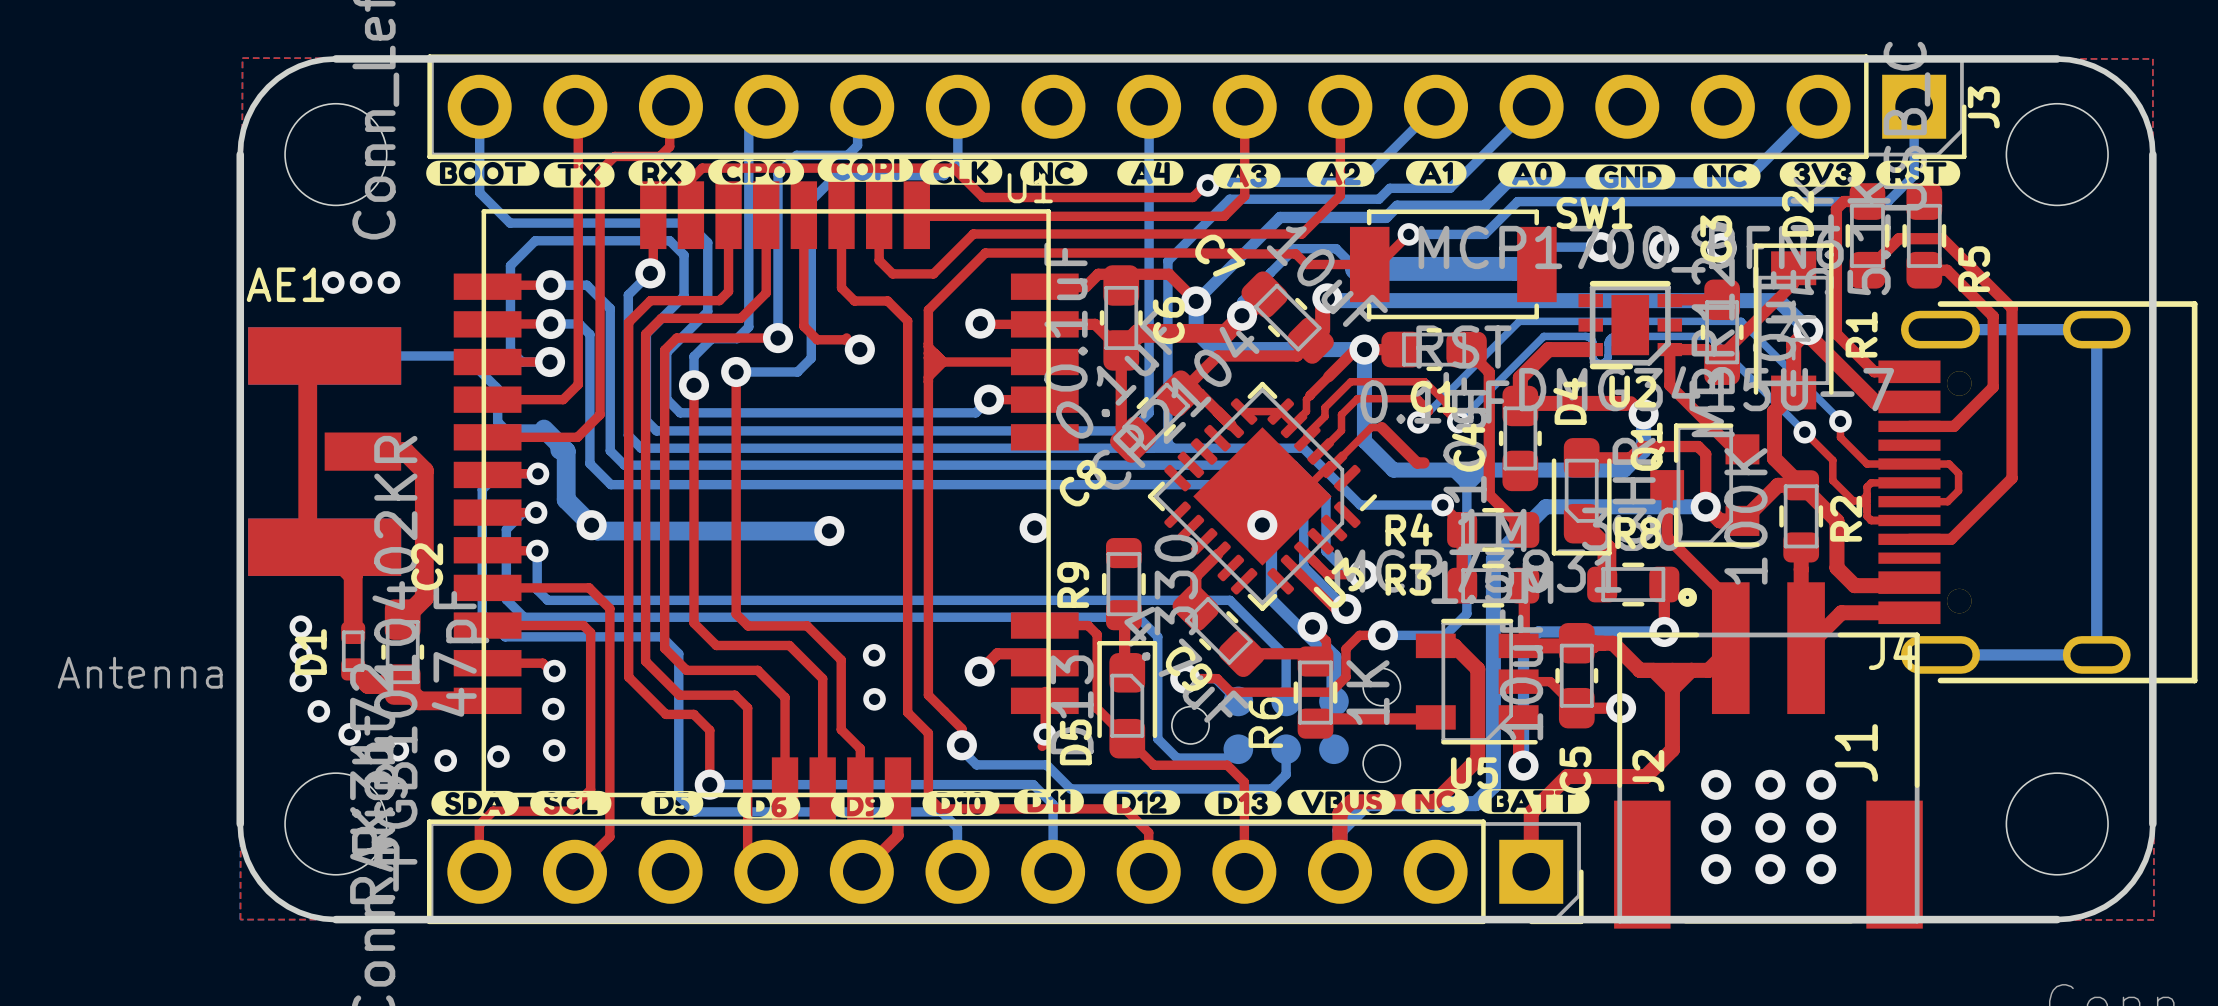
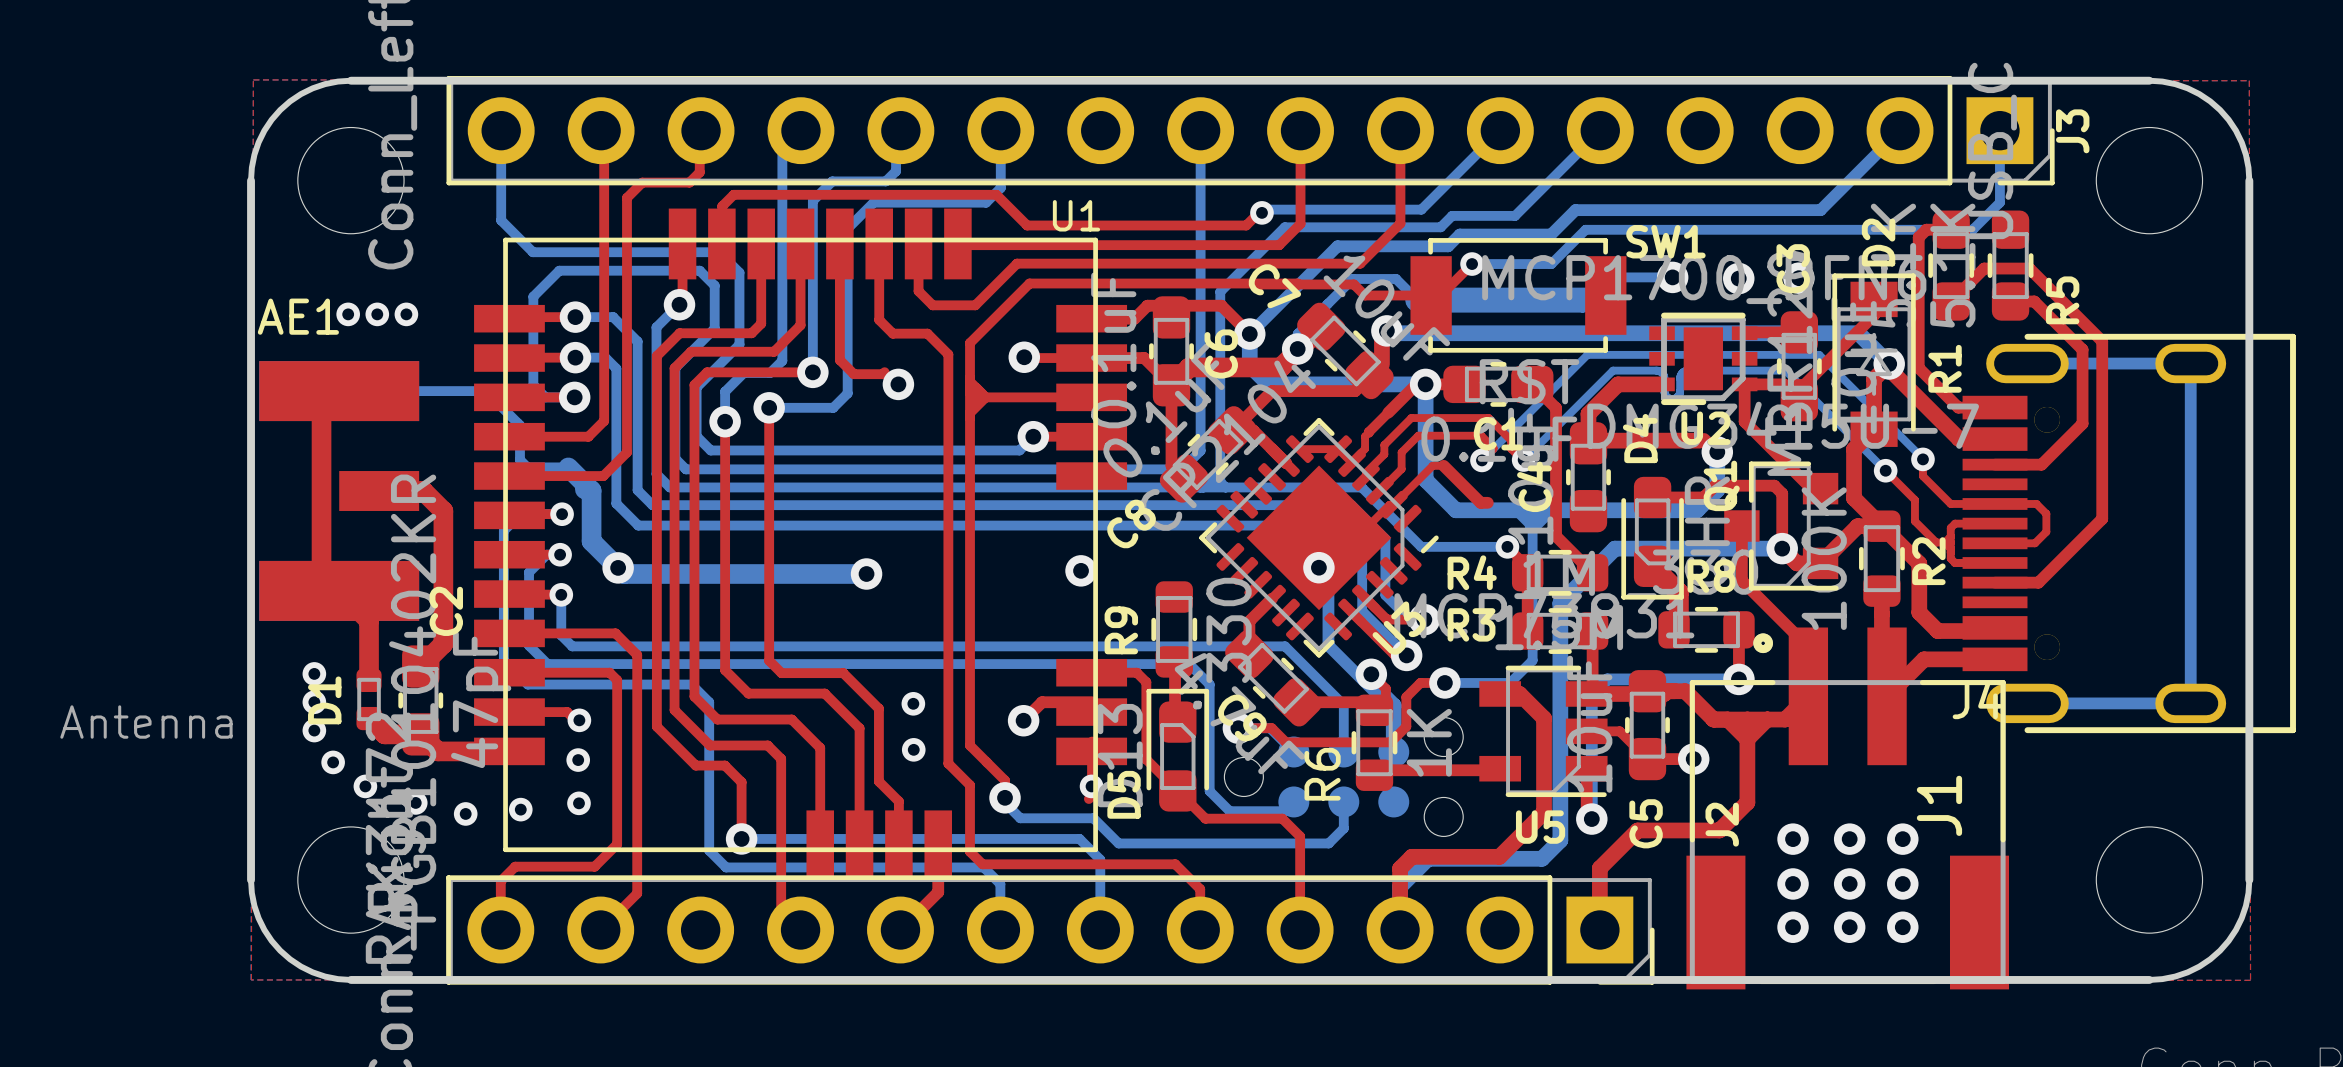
drawing: [426, 156, 1961, 190] -> none
drawing: [431, 789, 1590, 819] -> none

